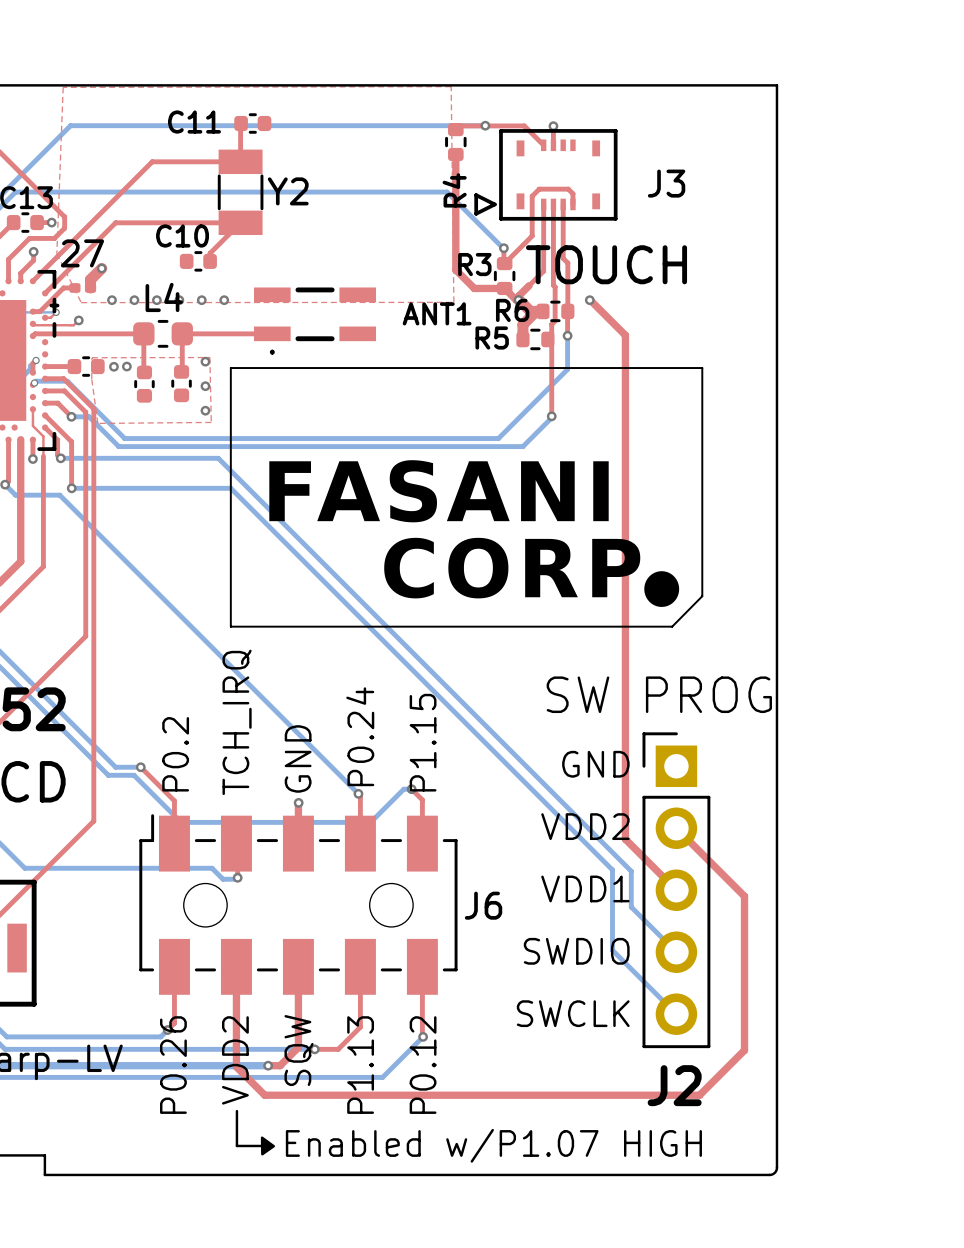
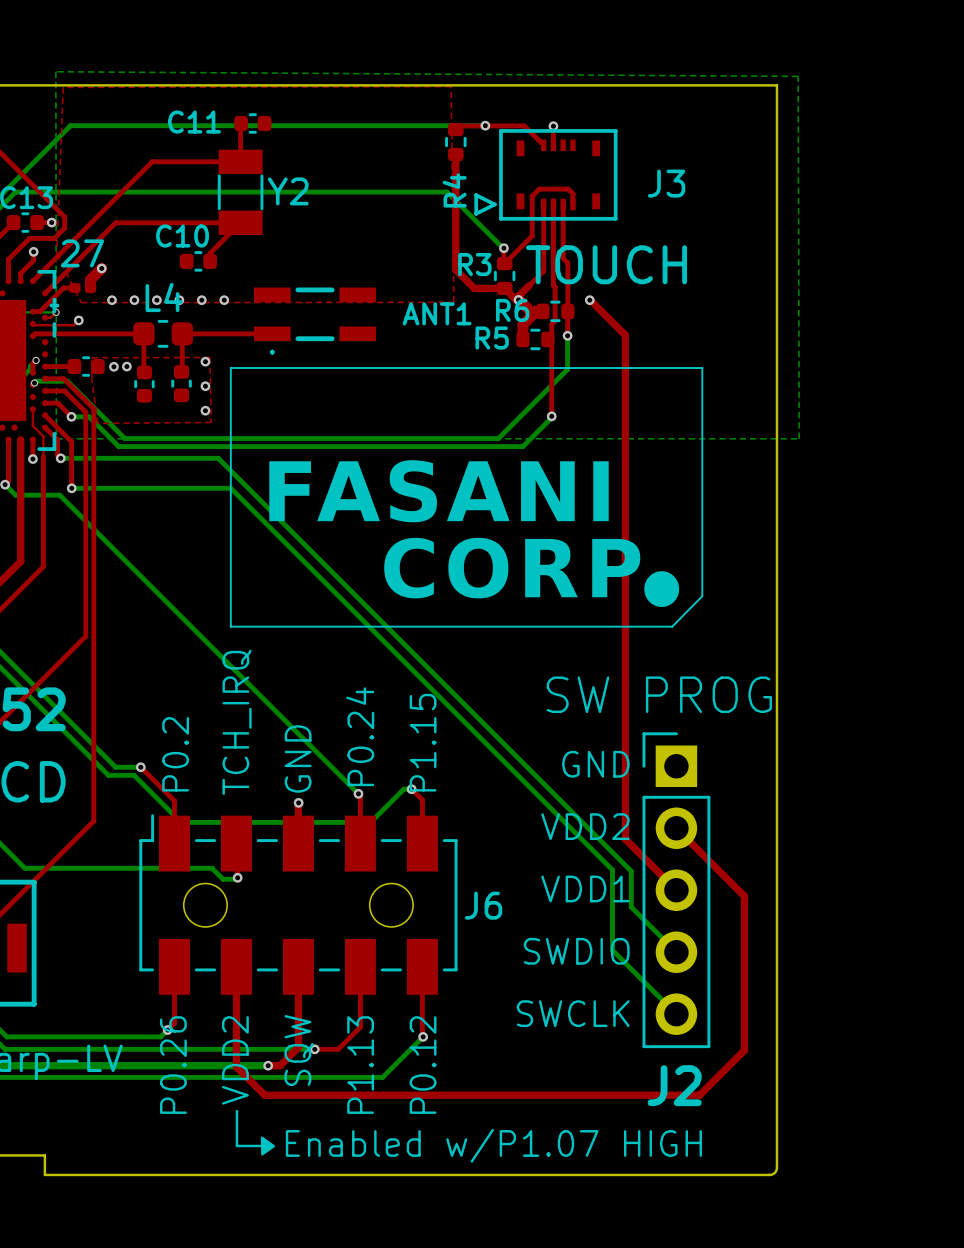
bottom zone outline: none -> (55, 71) (56, 438) (799, 438) (798, 76) (55, 71)

